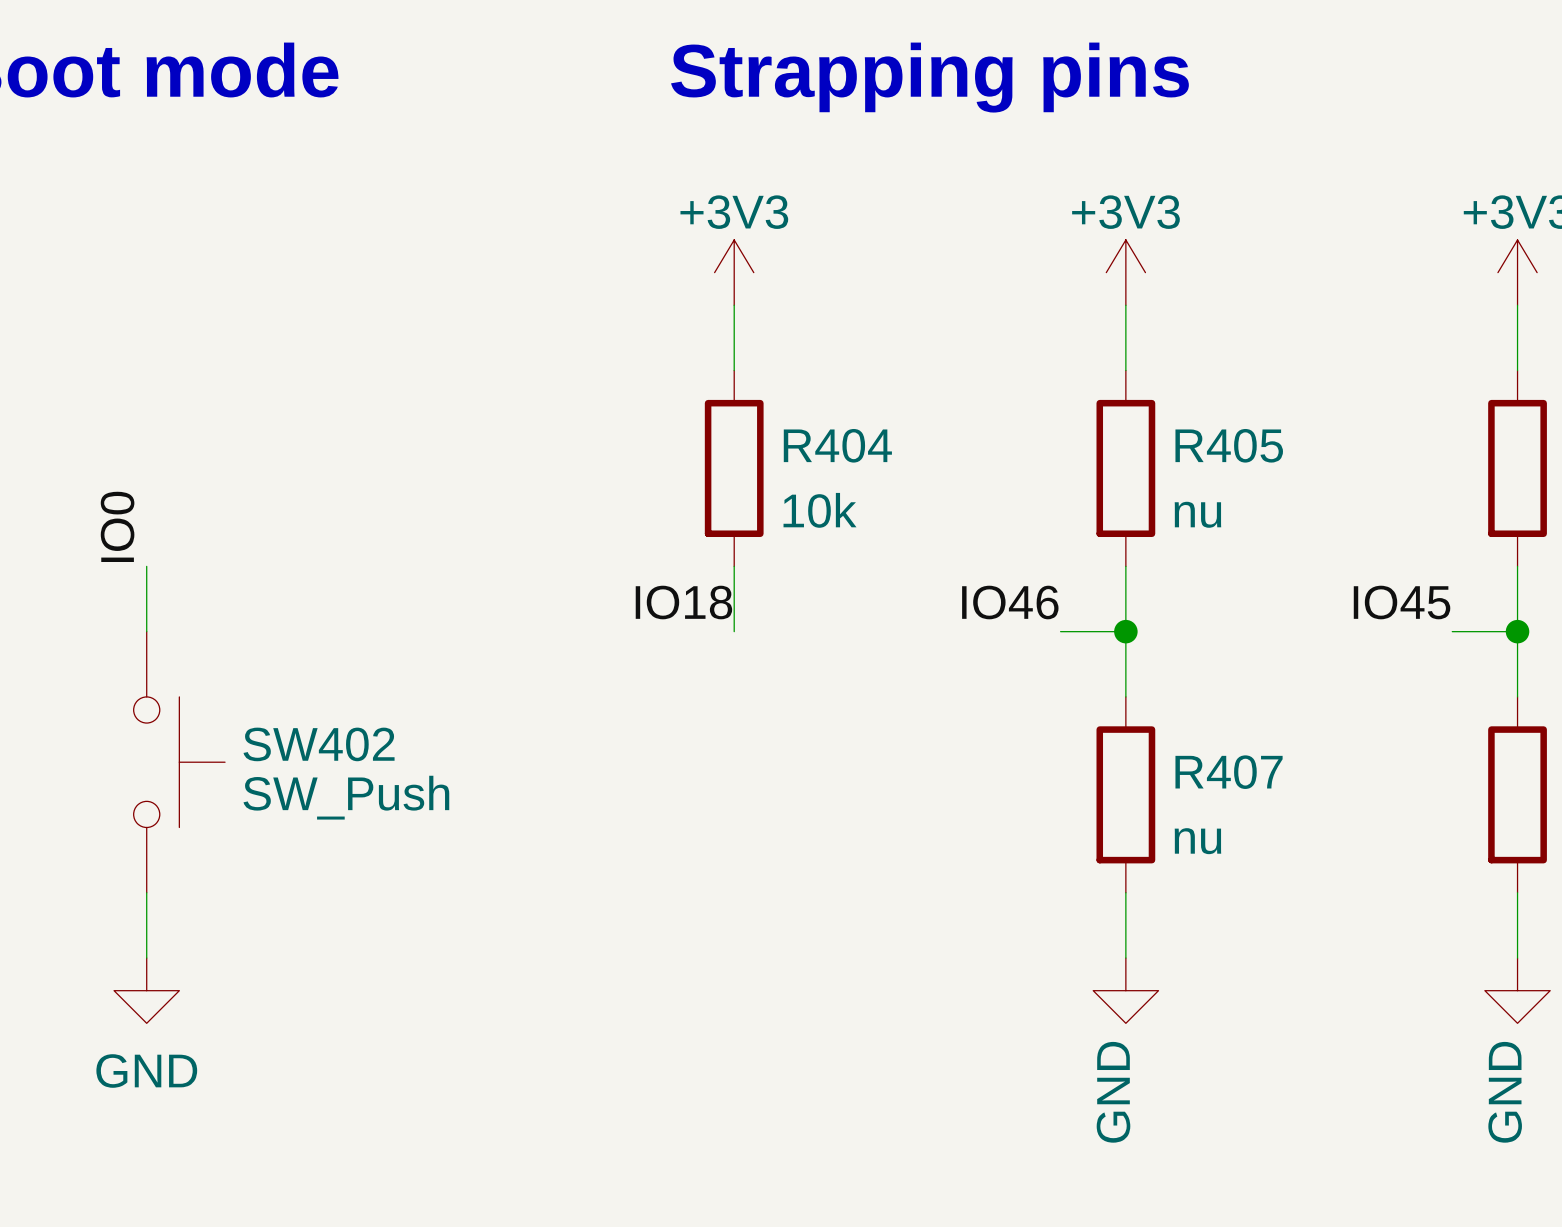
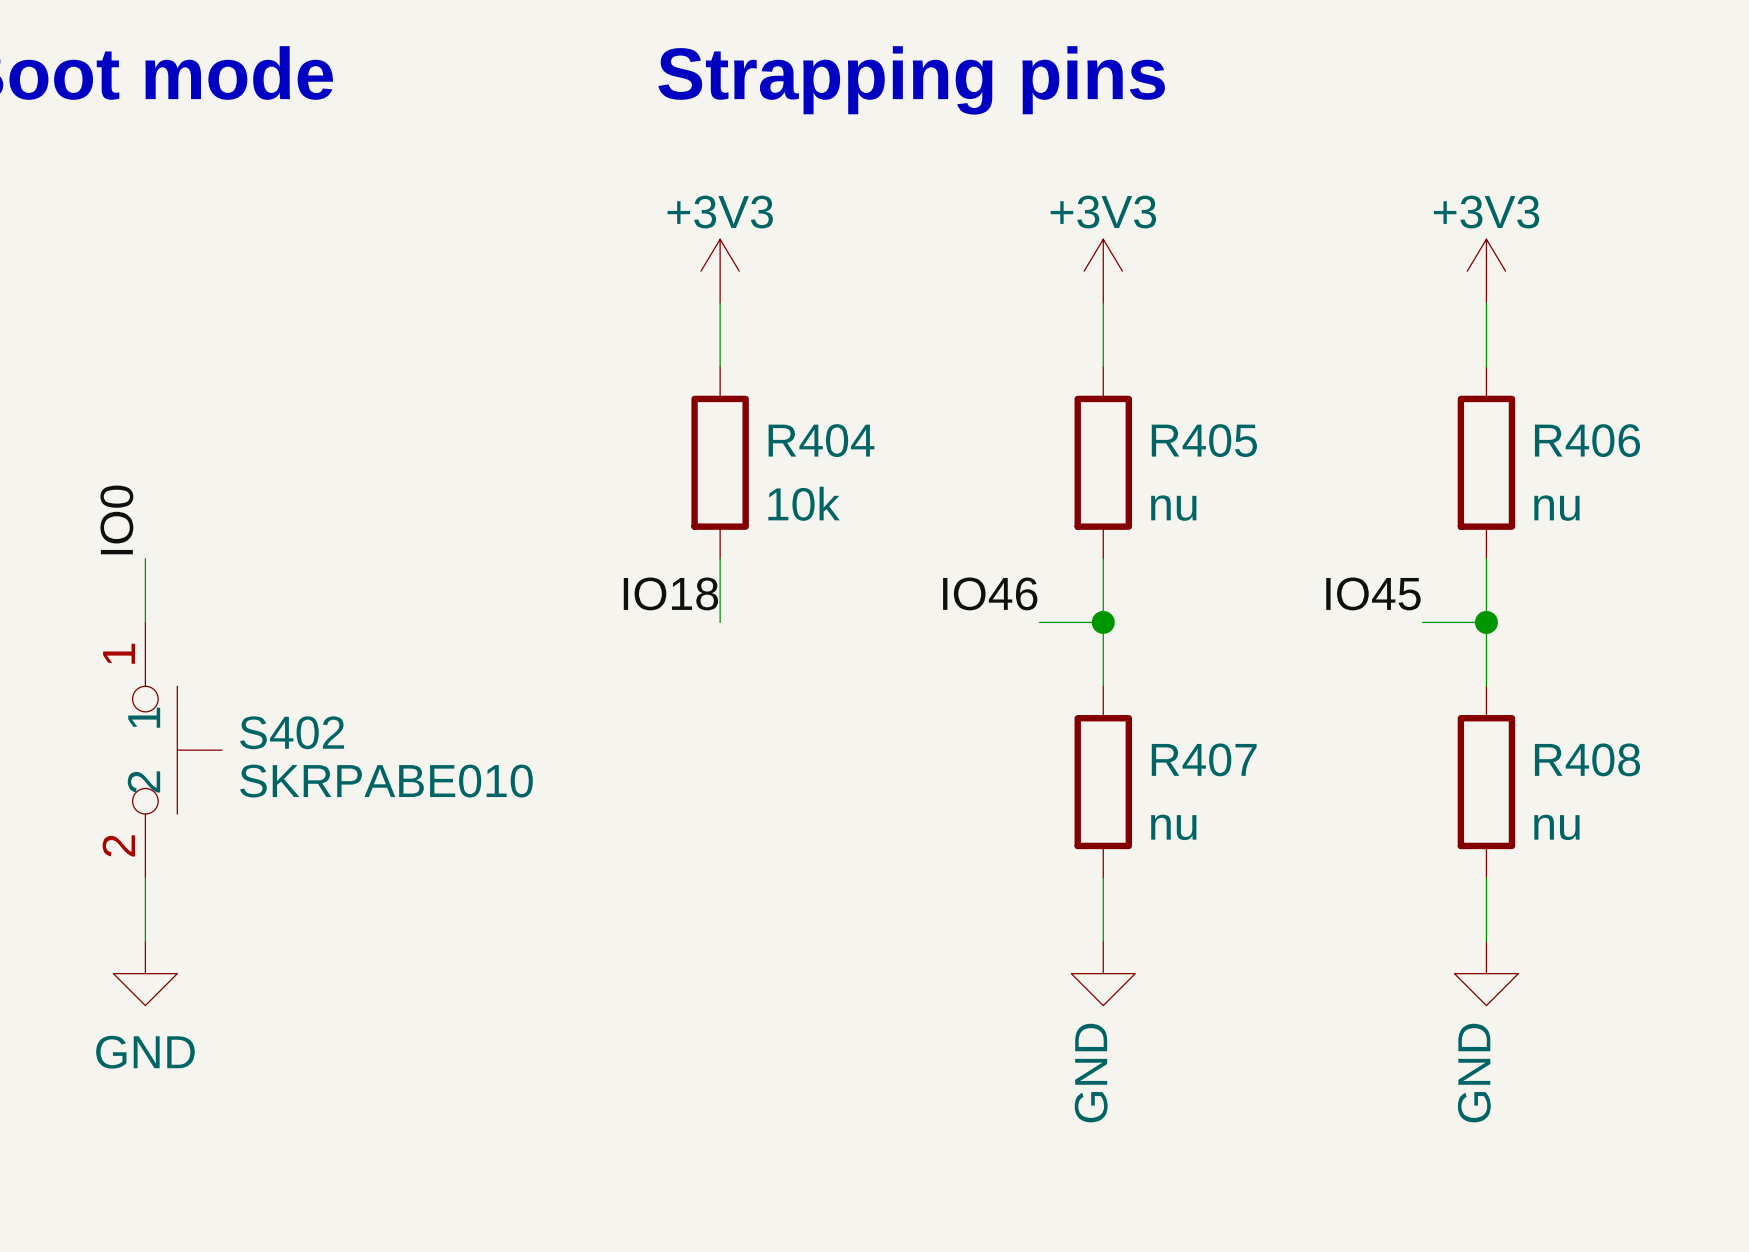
SW402 pin number: none -> 1 (119, 653)
SW402 pin name: none -> 1 (144, 717)
SW402 name: SW402 (319, 744) -> S402 (292, 732)
SW402 pin name: none -> 2 (143, 781)
SW402 value: SW_Push (346, 797) -> SKRPABE010 (386, 781)
SW402 pin number: none -> 2 (118, 845)

